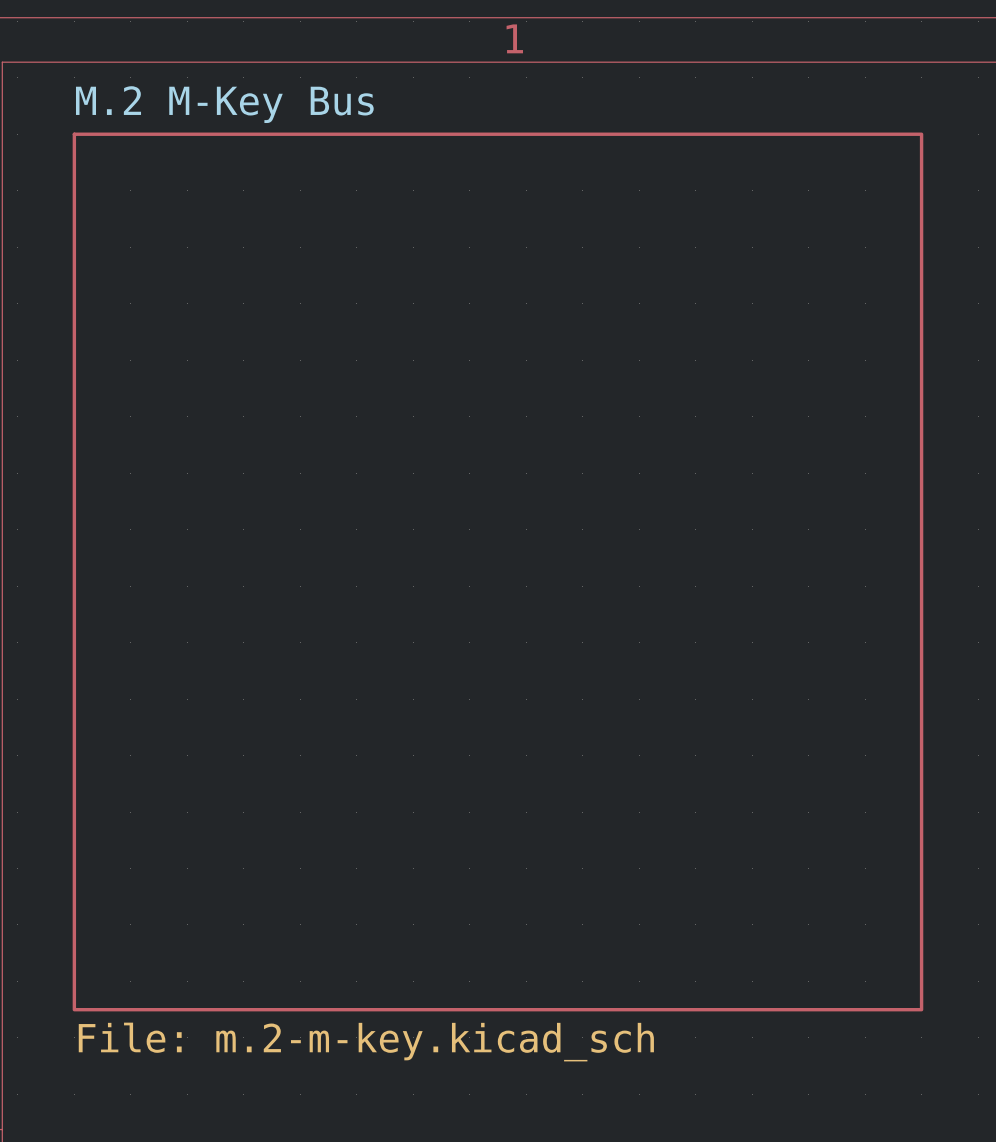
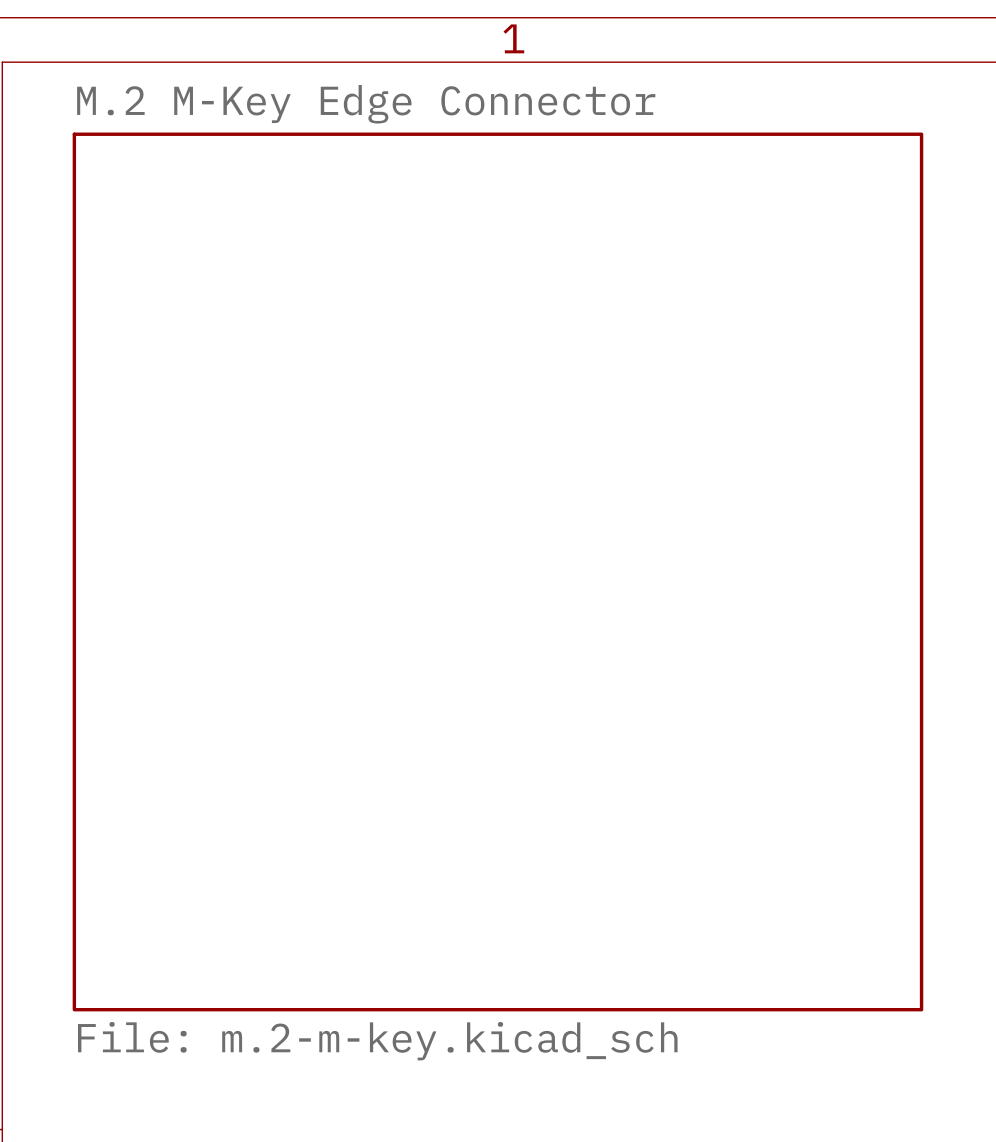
sheet M.2 M-Key Bus name: M.2 M-Key Bus (224, 104) -> M.2 M-Key Edge Connector (366, 104)

